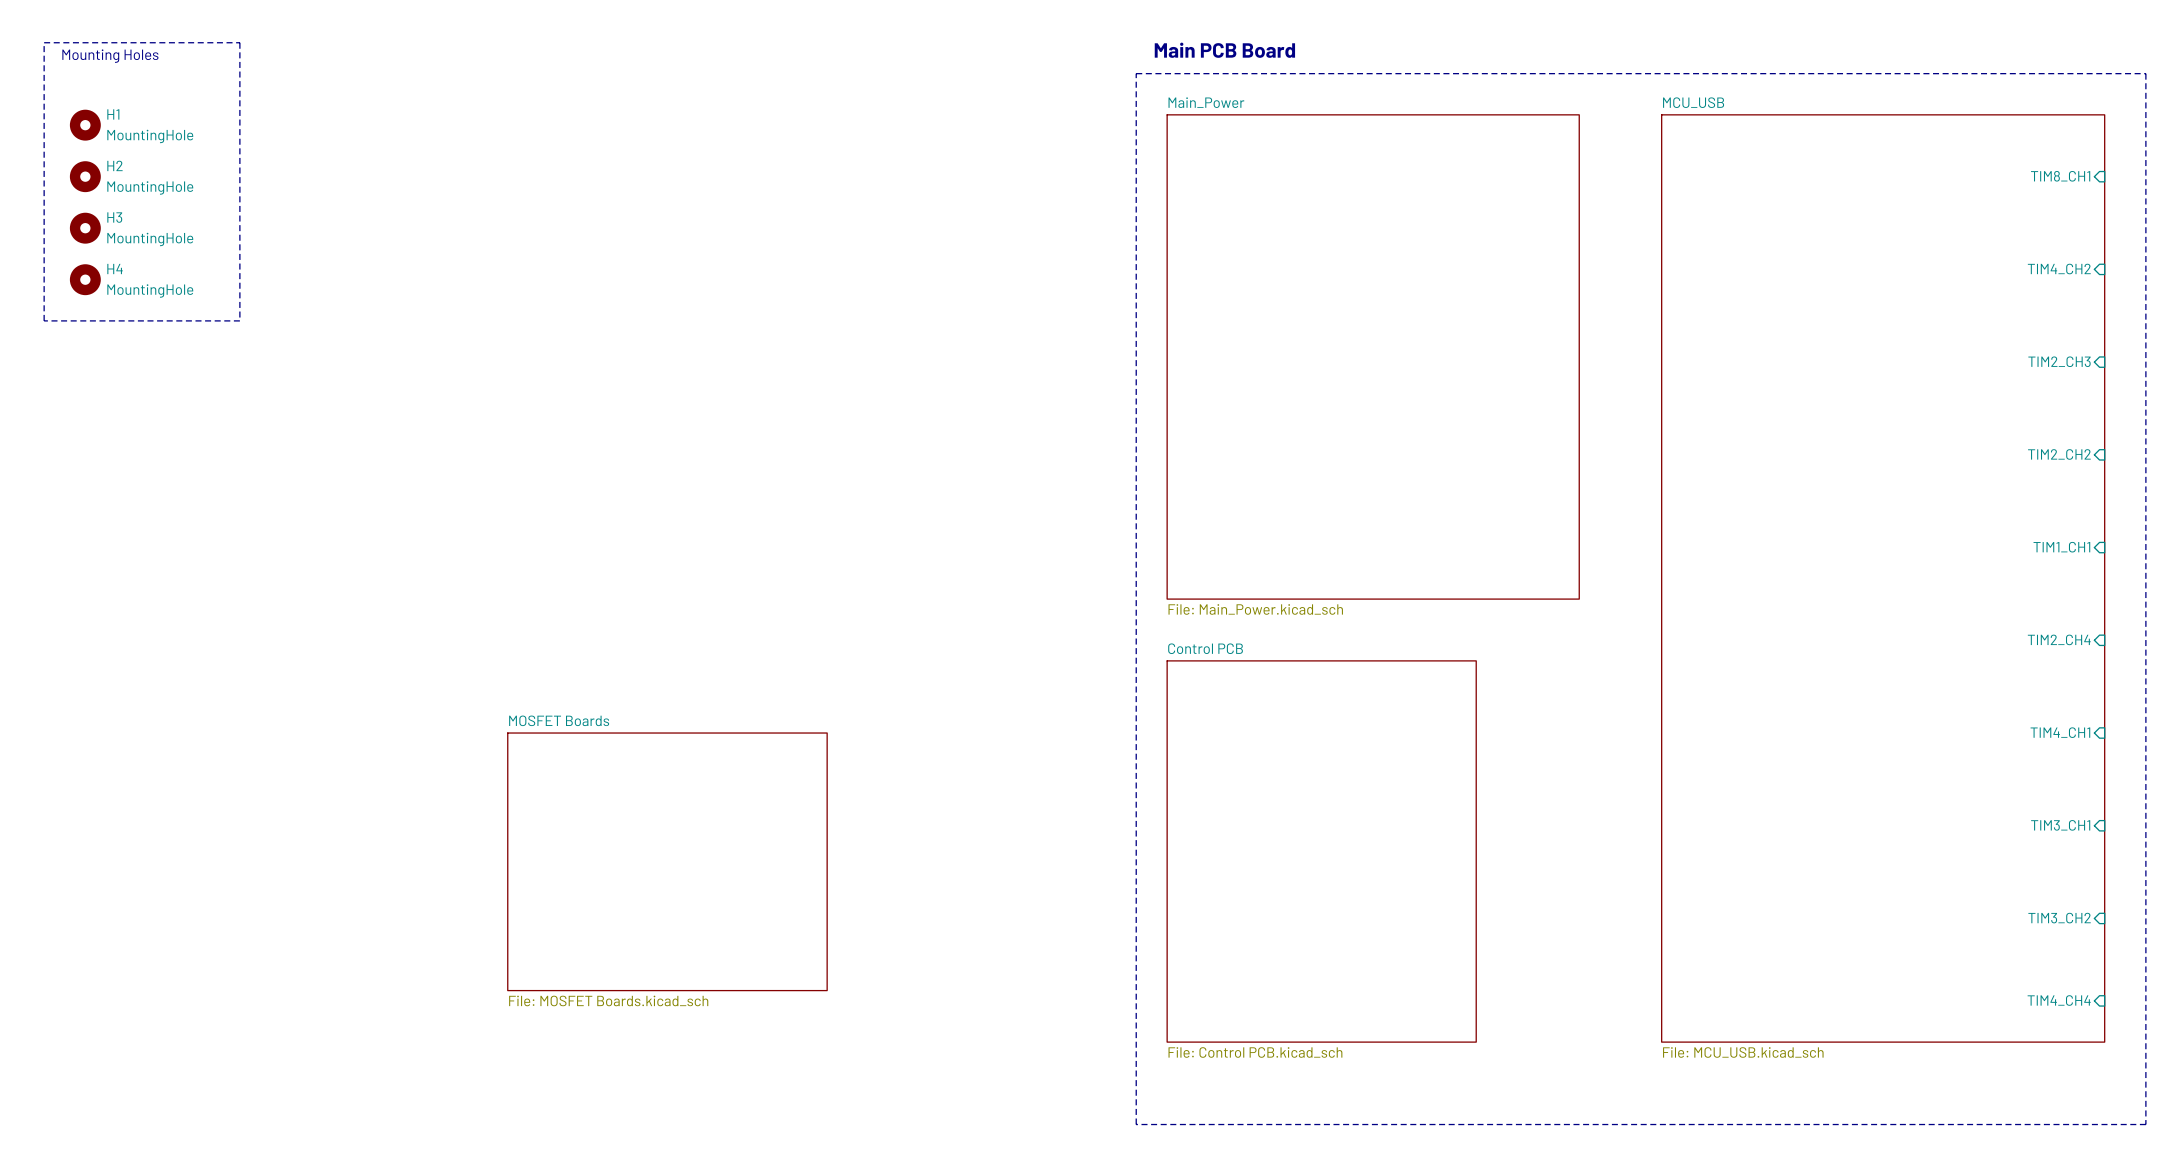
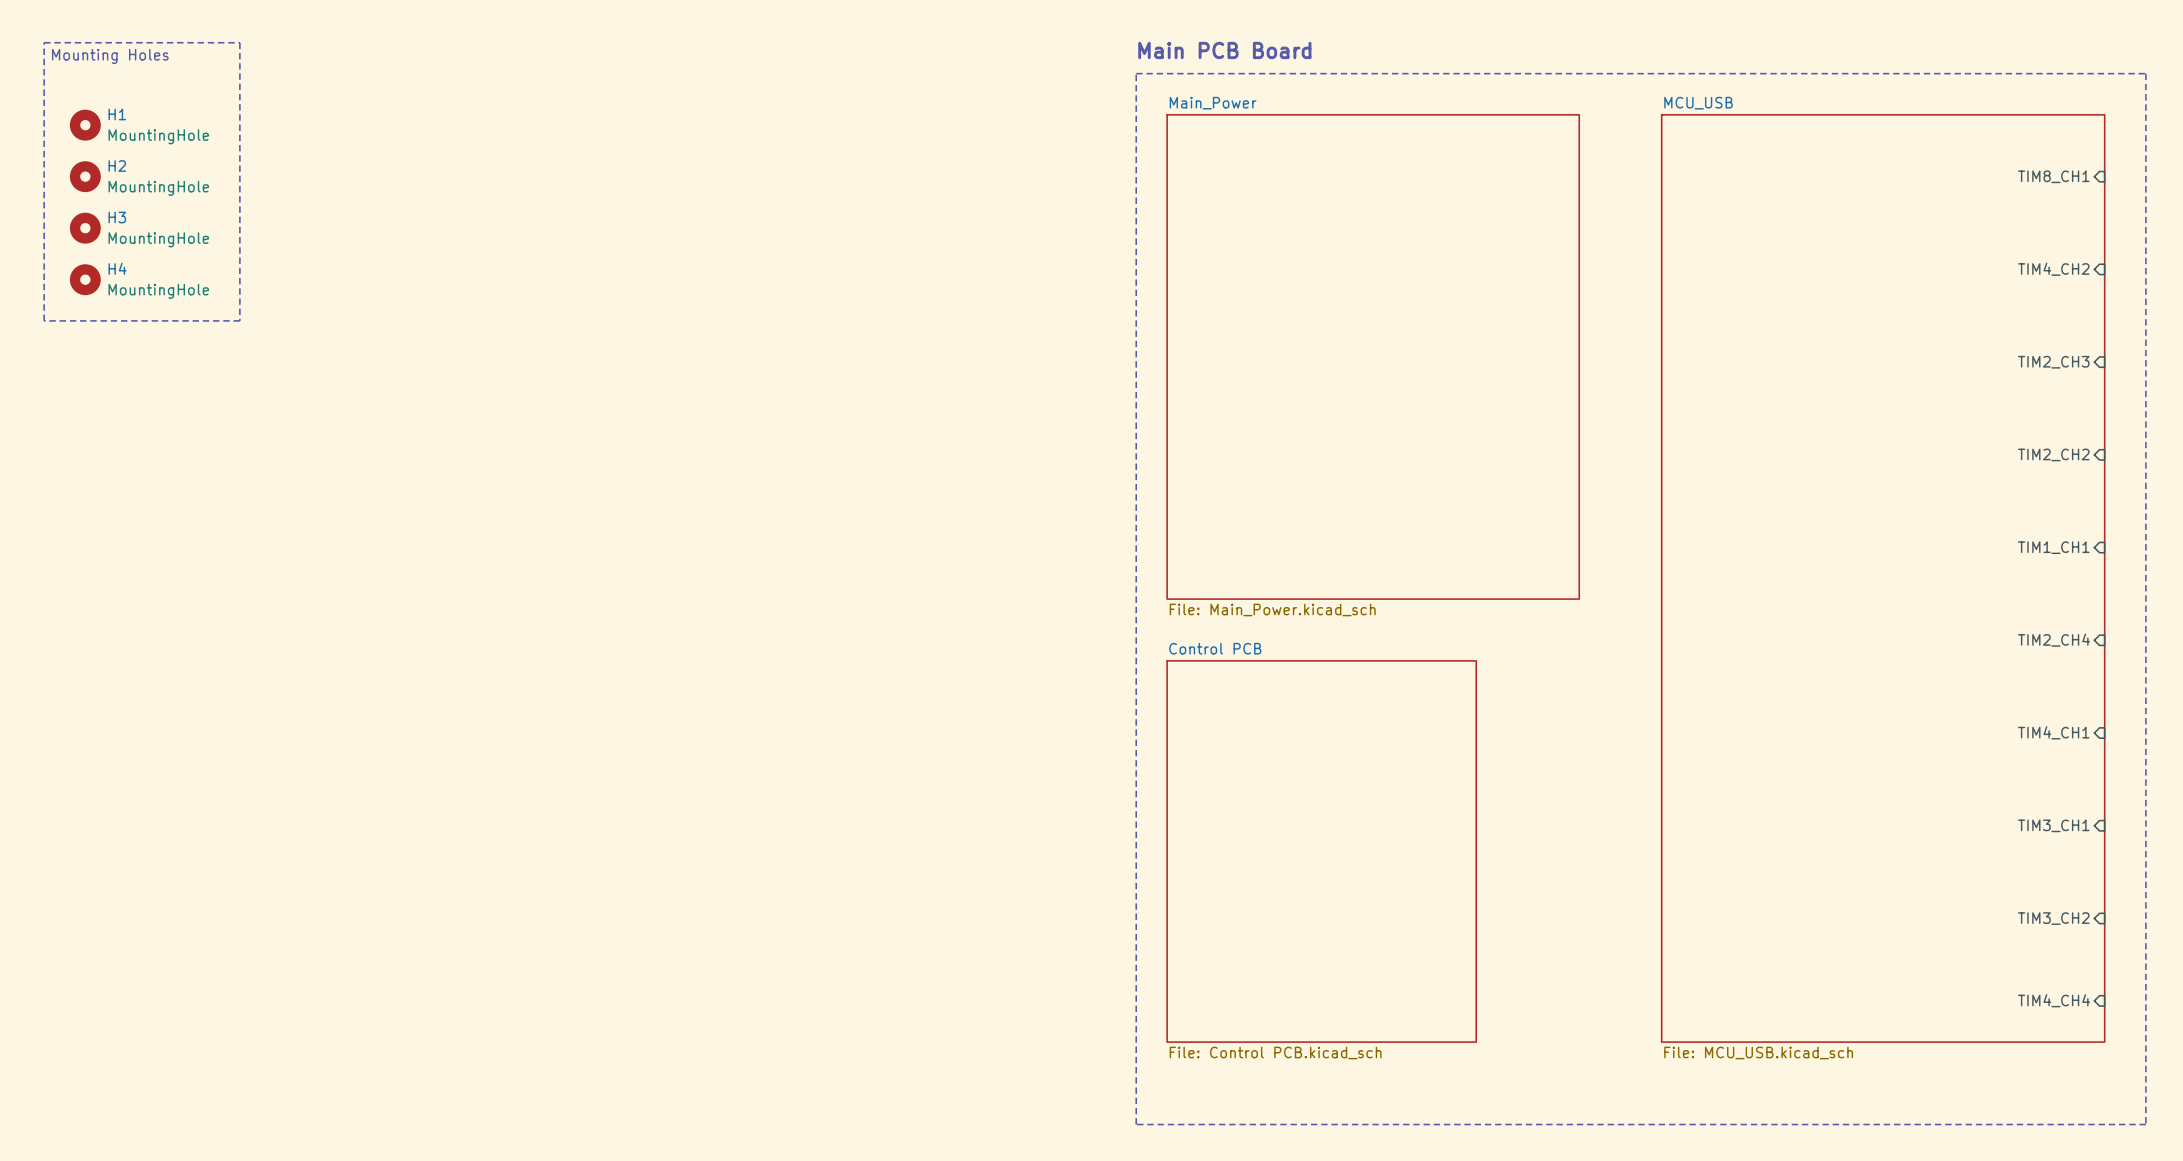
sheet MOSFET Boards: File: MOSFET Boards.kicad_sch (667, 861) -> none

